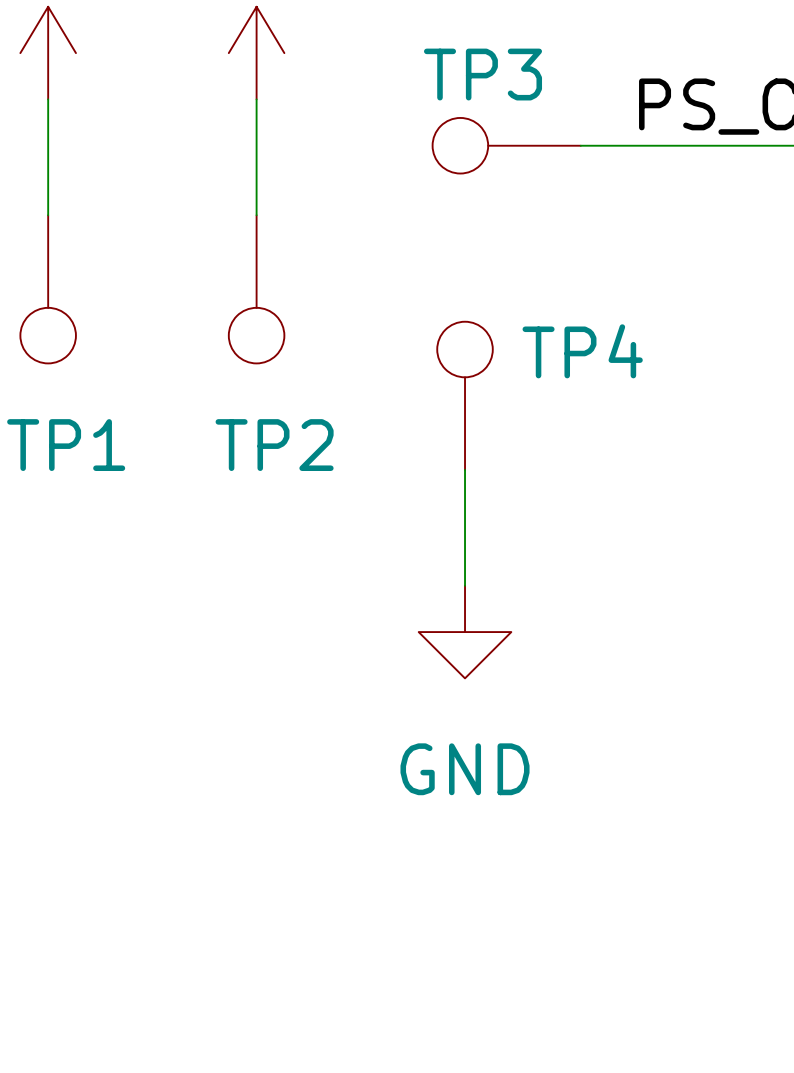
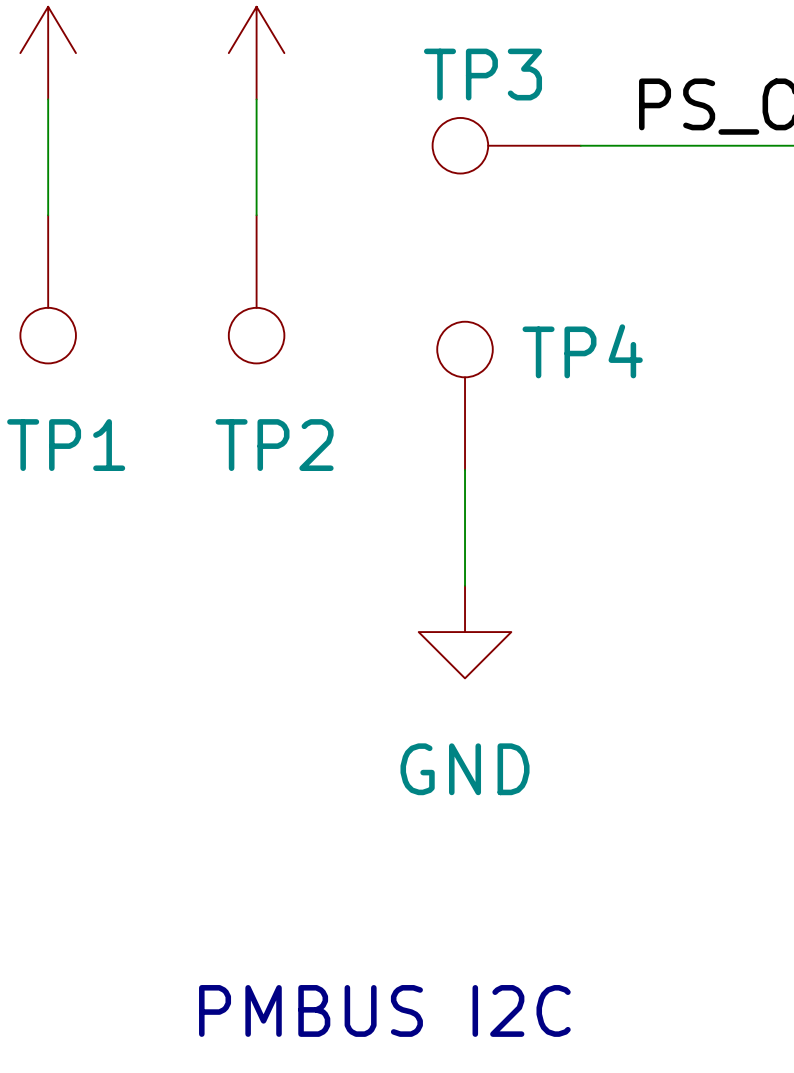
text: none -> PMBUS I2C (384, 1010)

